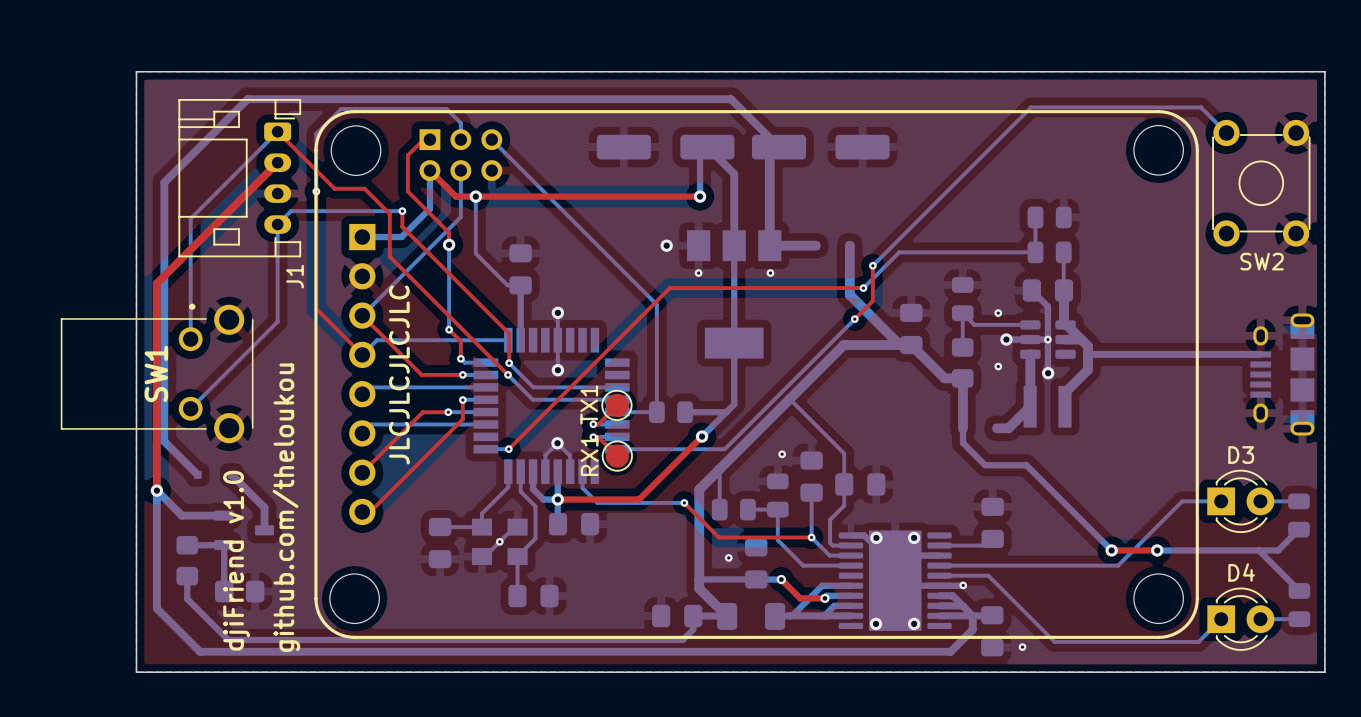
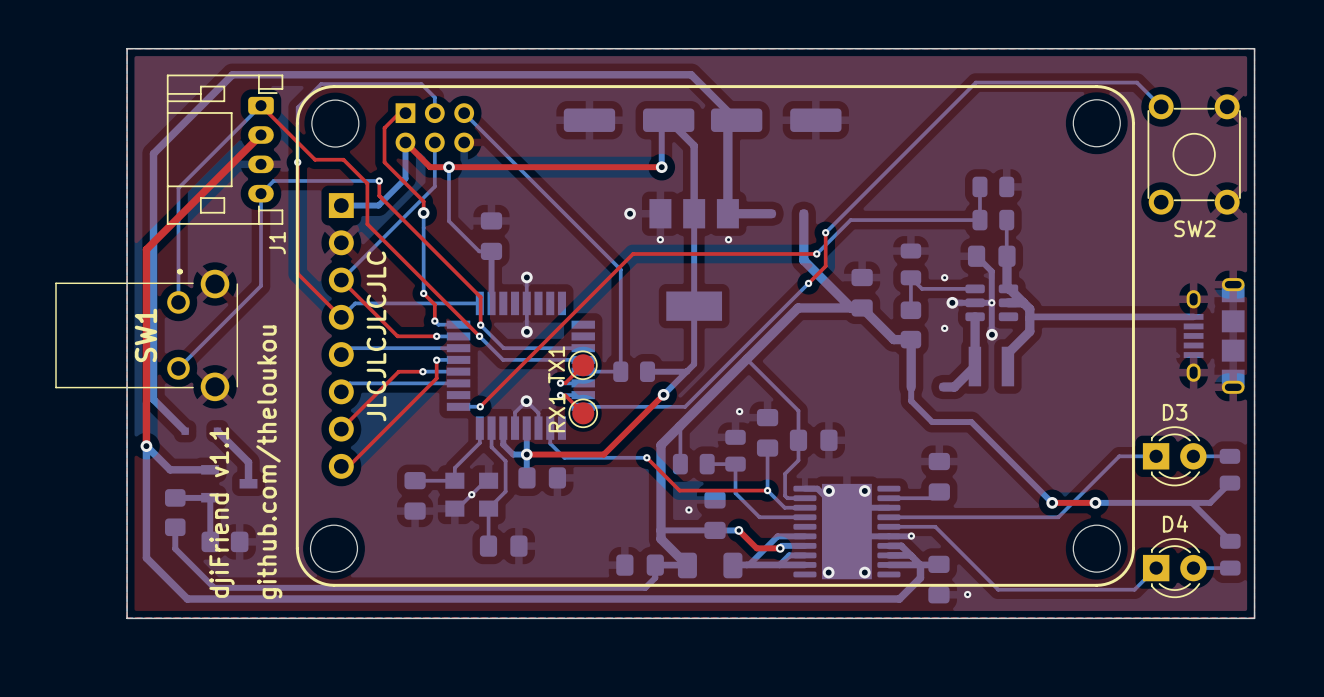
text: djiFriend v1.0 (236, 560) -> djiFriend v1.1 (222, 512)

